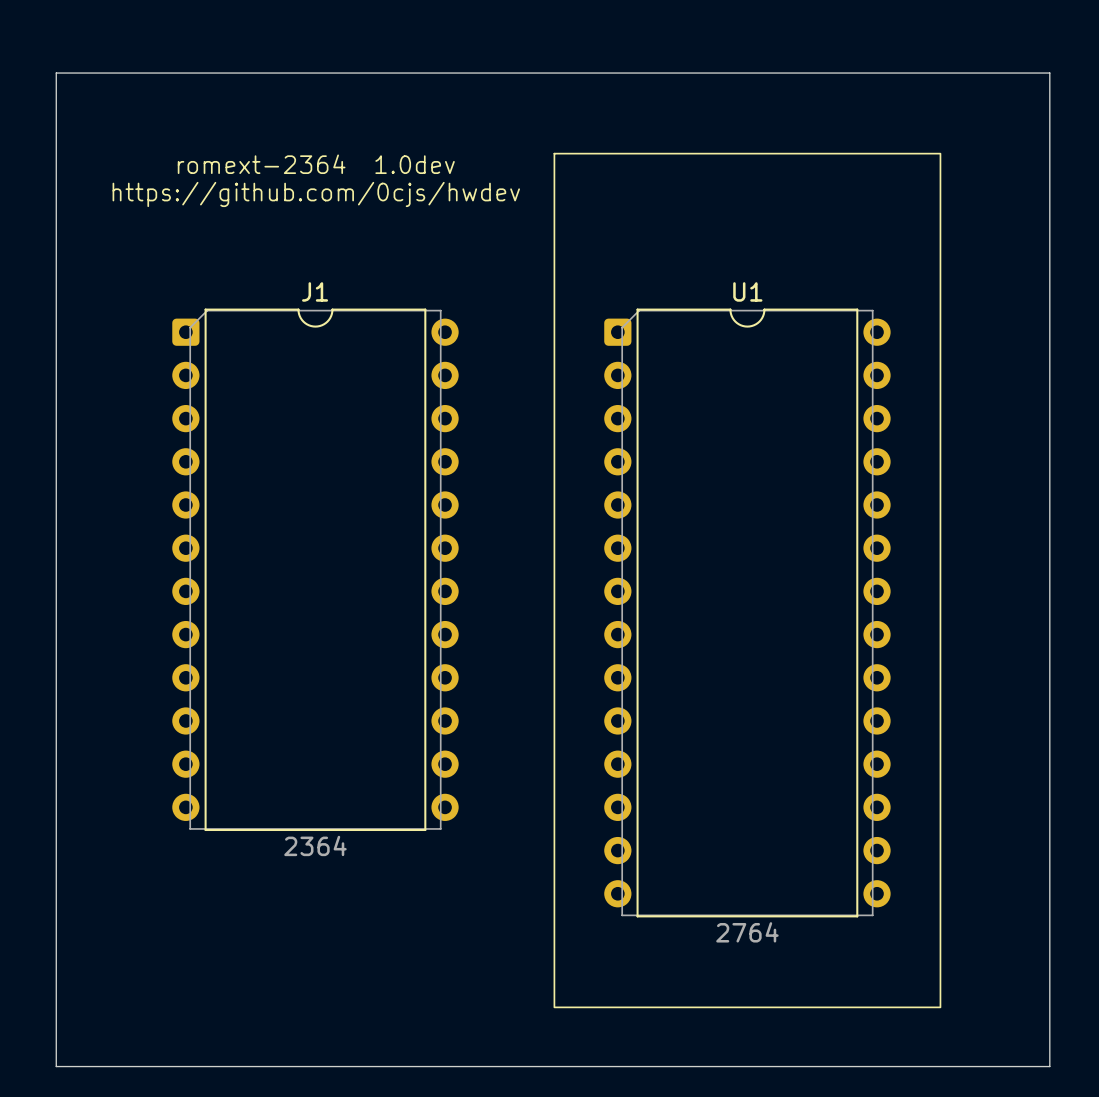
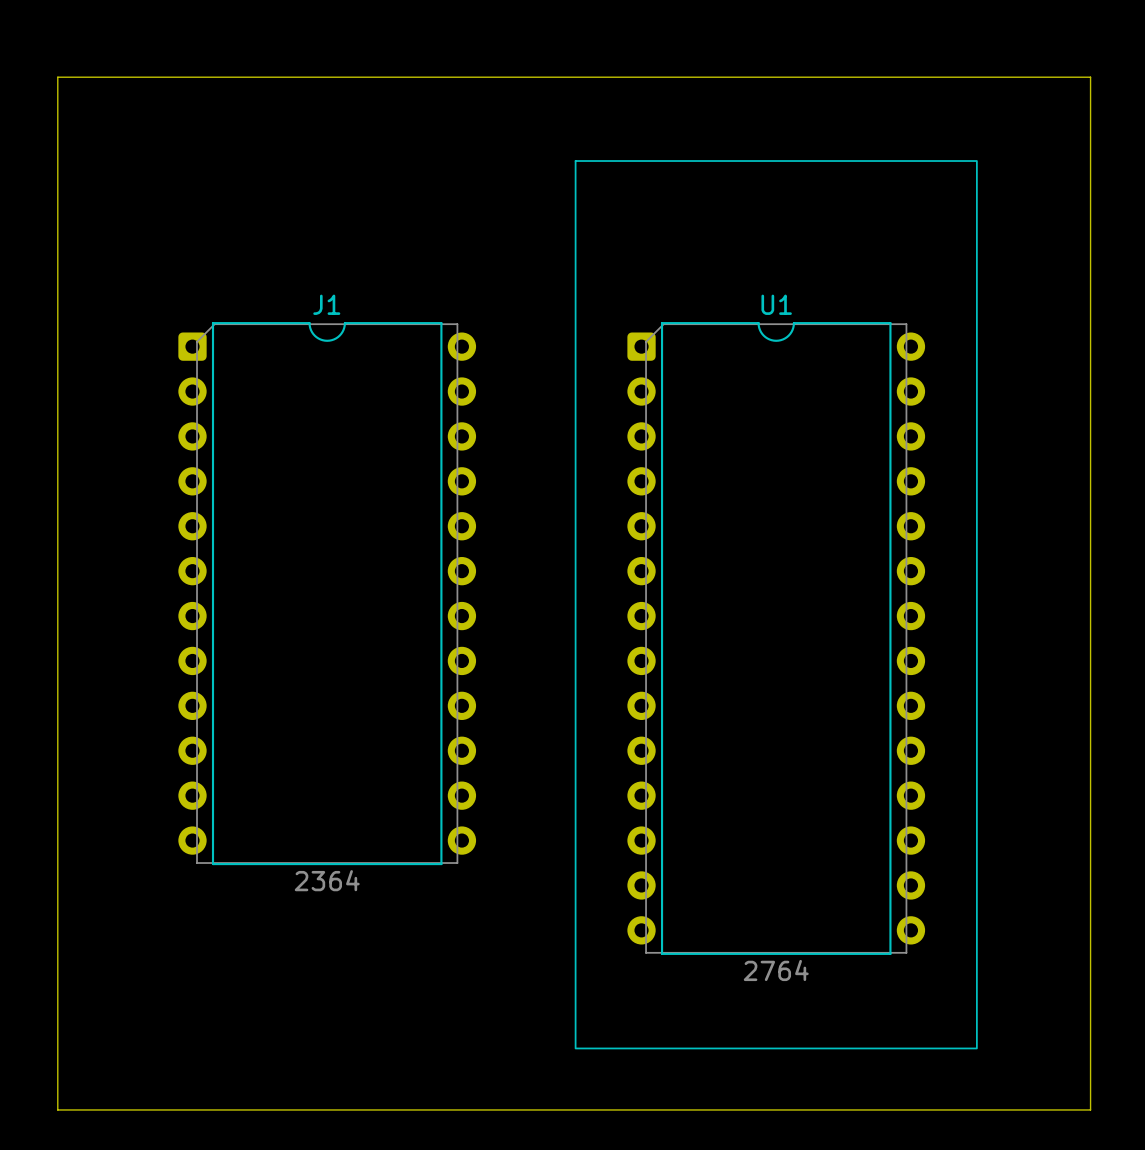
text: romext-2364 1.0dev (316, 164) -> none
text: https://github.com/0cjs/hwdev (316, 194) -> none

